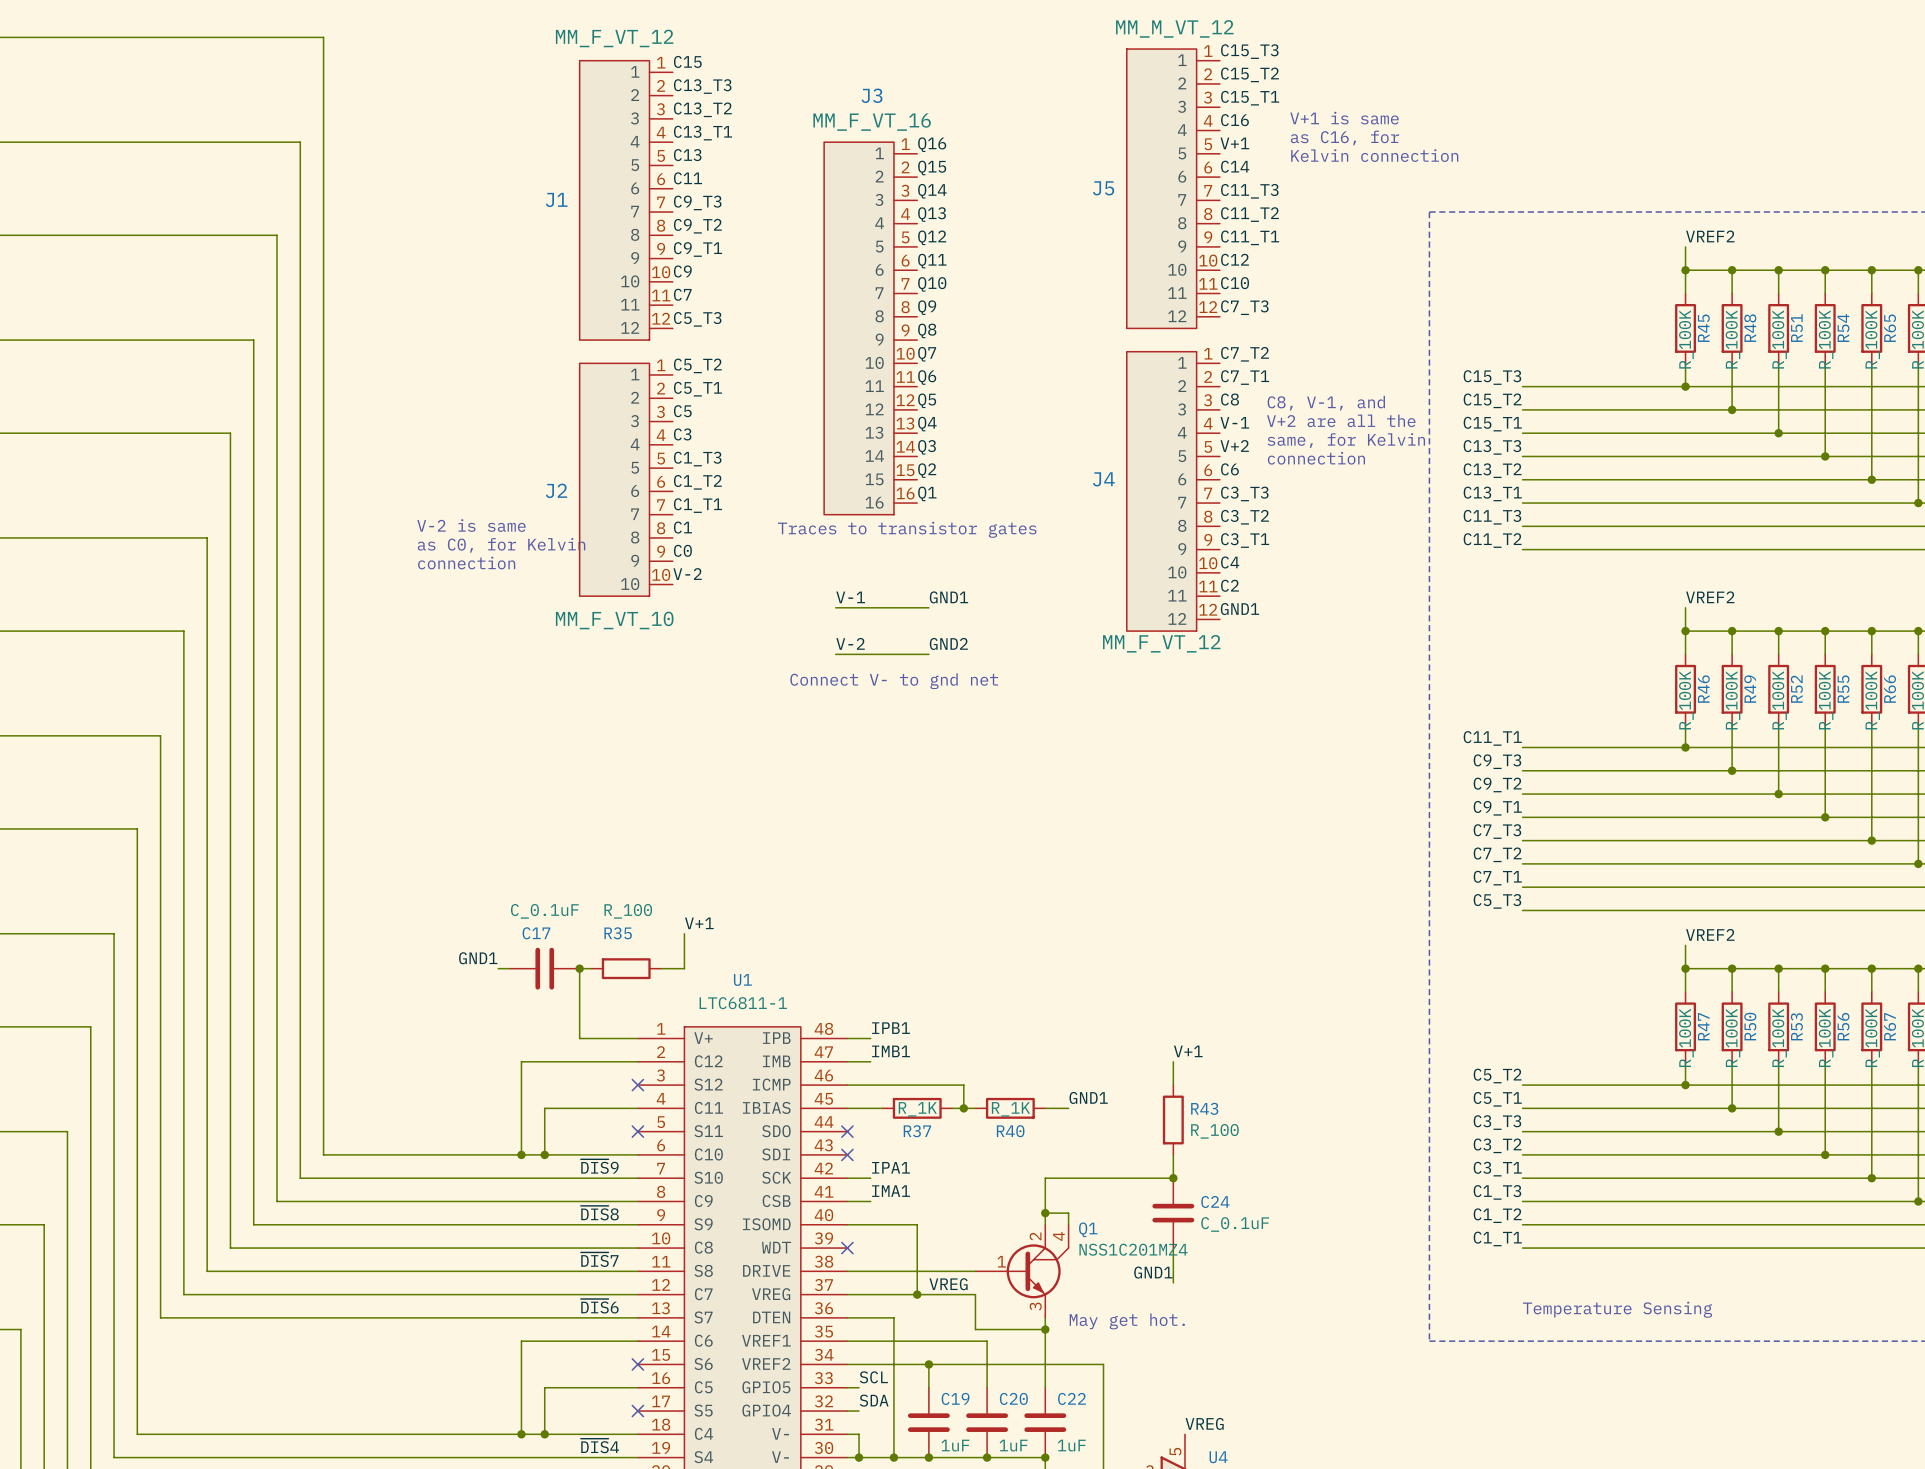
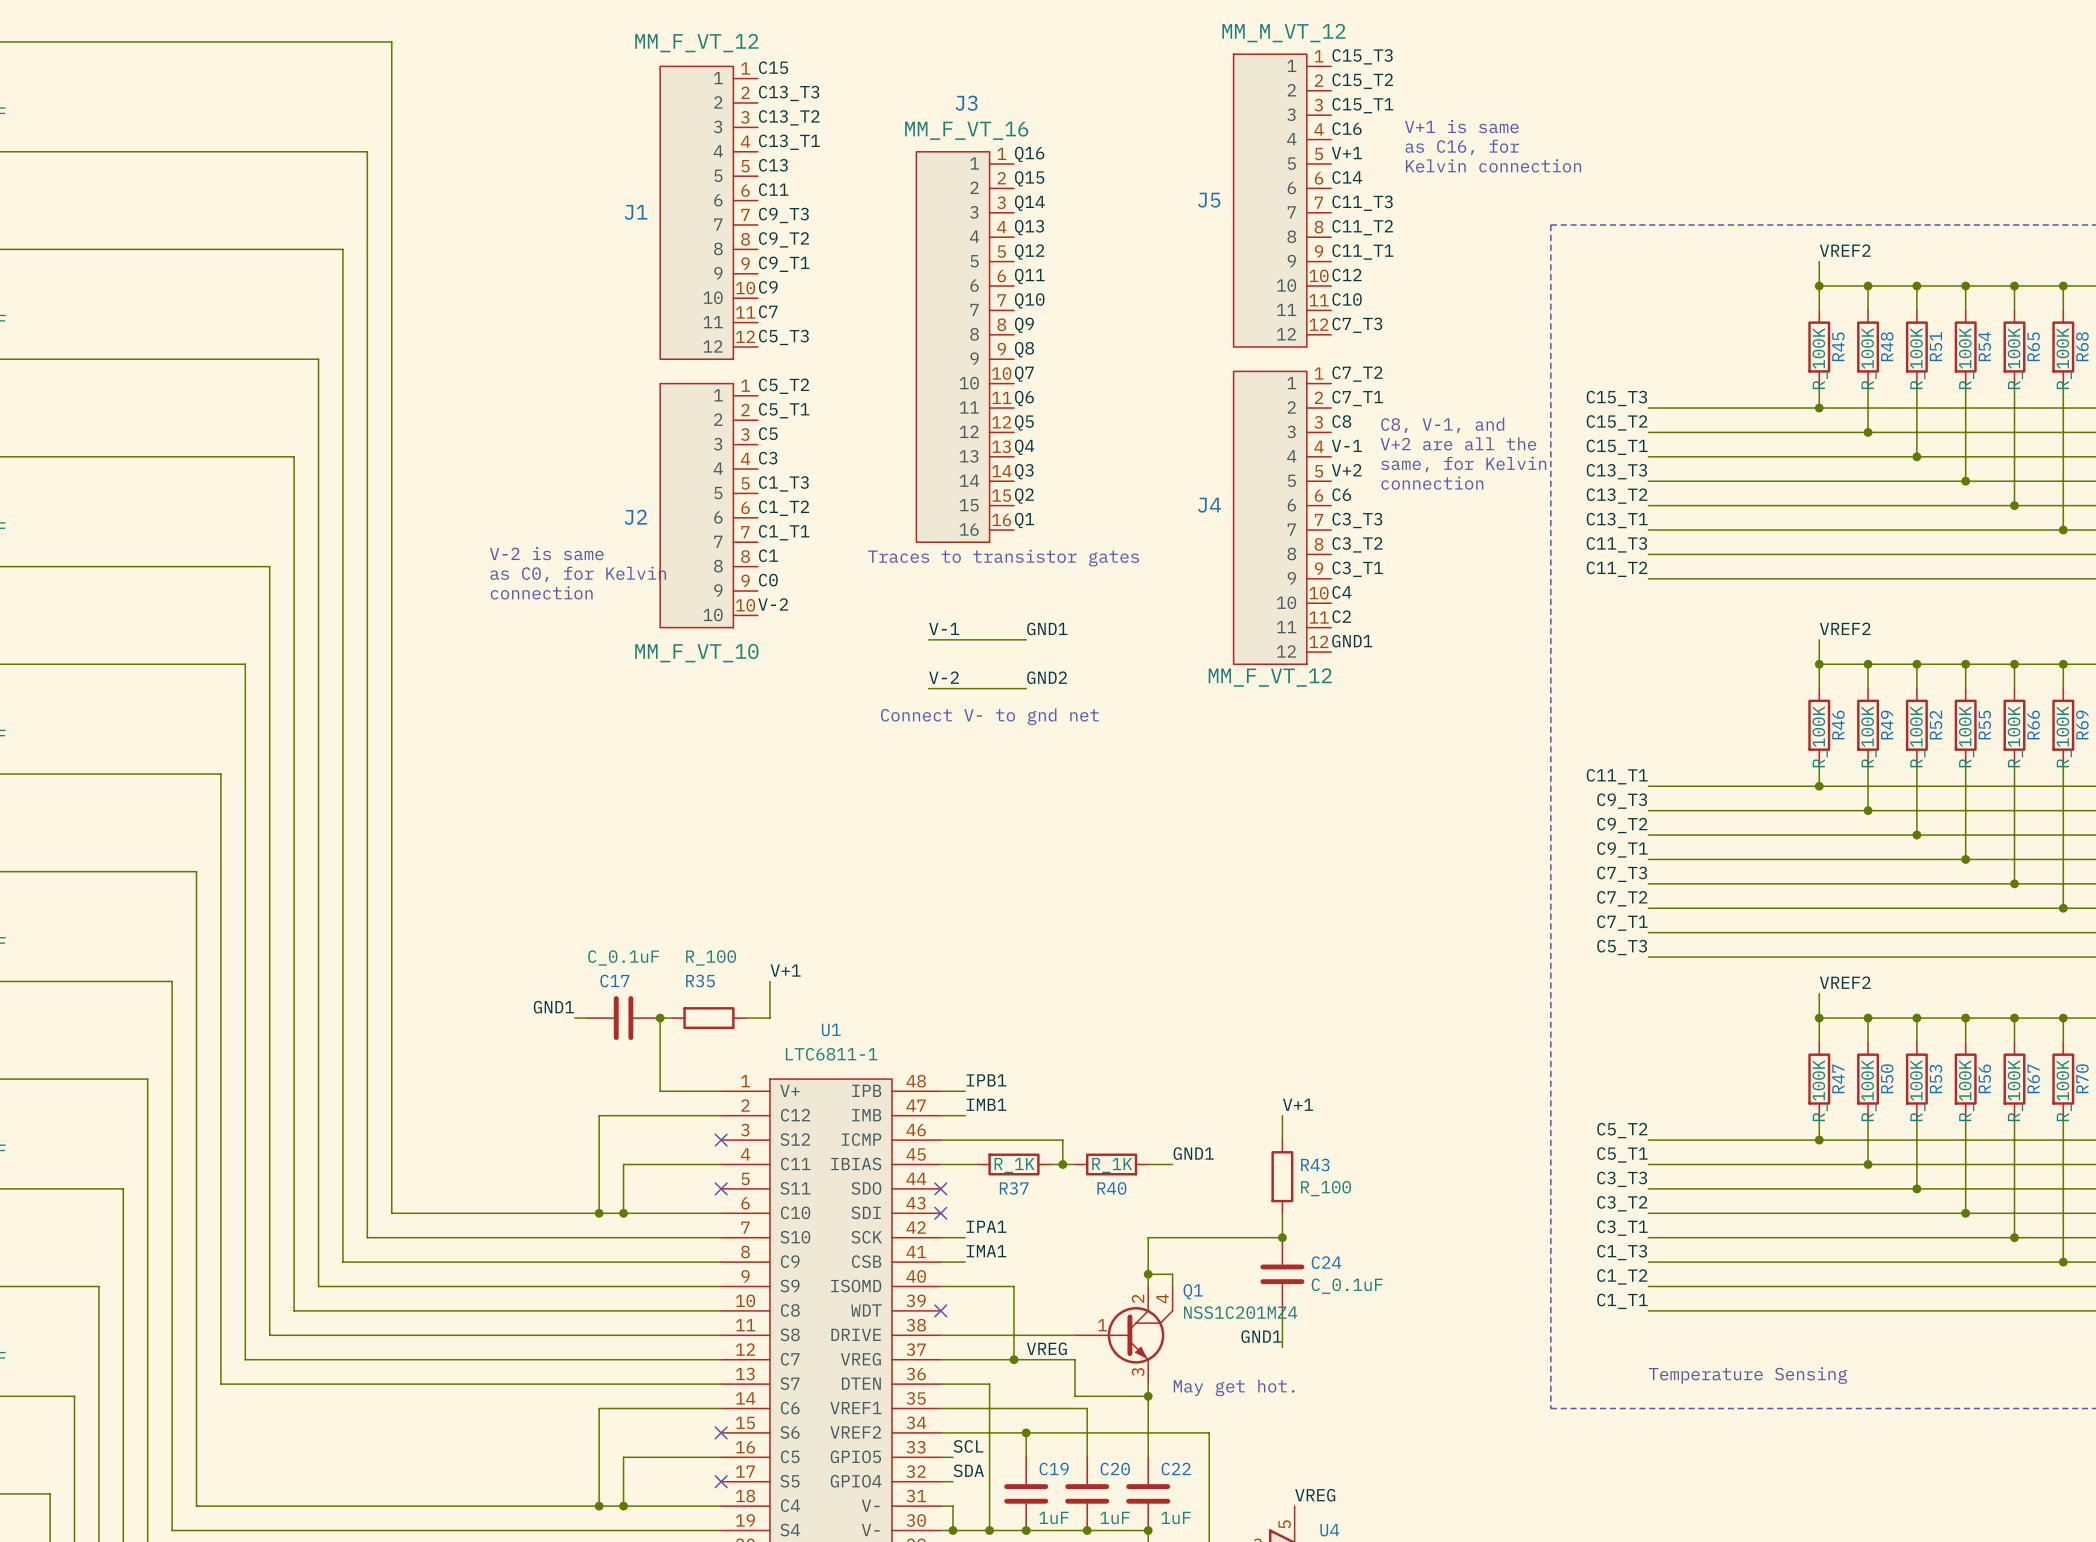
label: ~{DIS}9 (599, 1166) -> none
label: ~{DIS}8 (599, 1213) -> none
label: ~{DIS}7 (599, 1259) -> none
label: ~{DIS}6 (599, 1306) -> none
label: ~{DIS}4 (599, 1445) -> none

